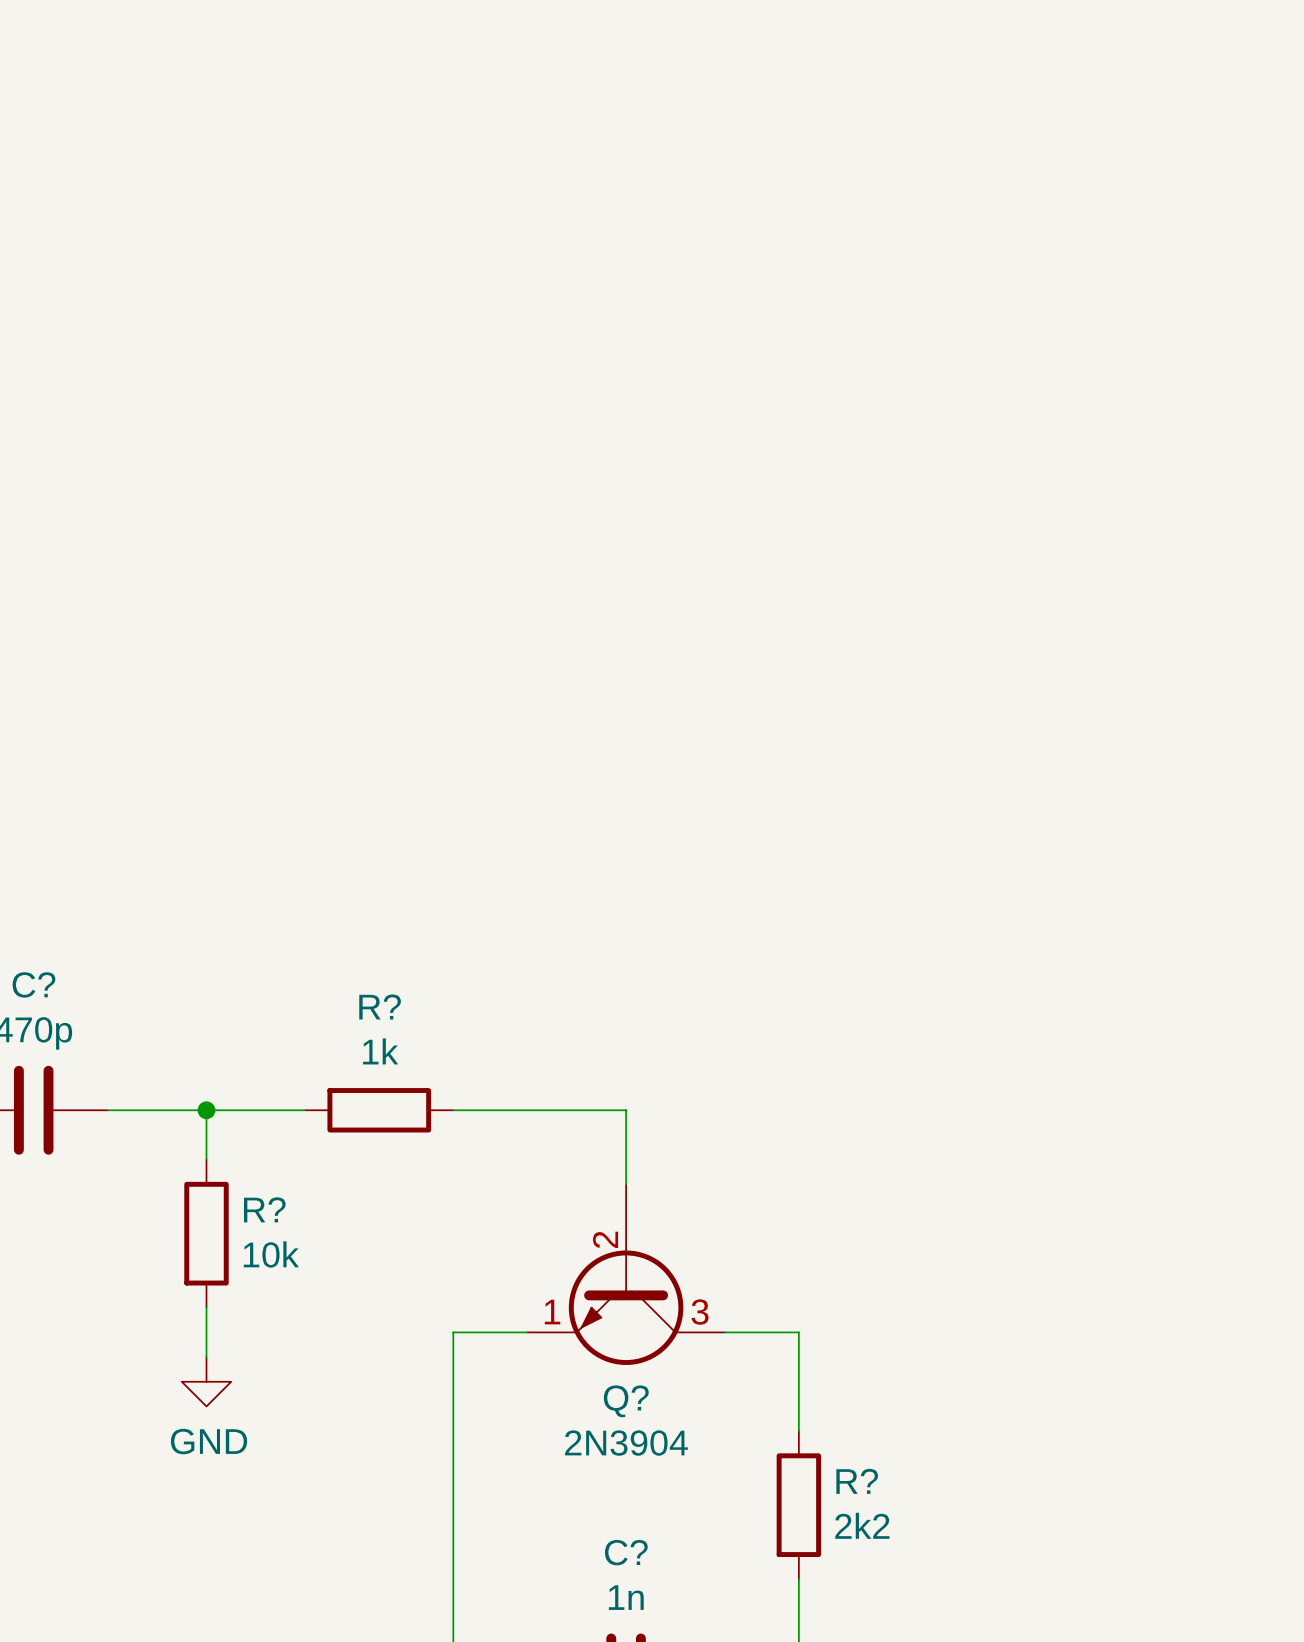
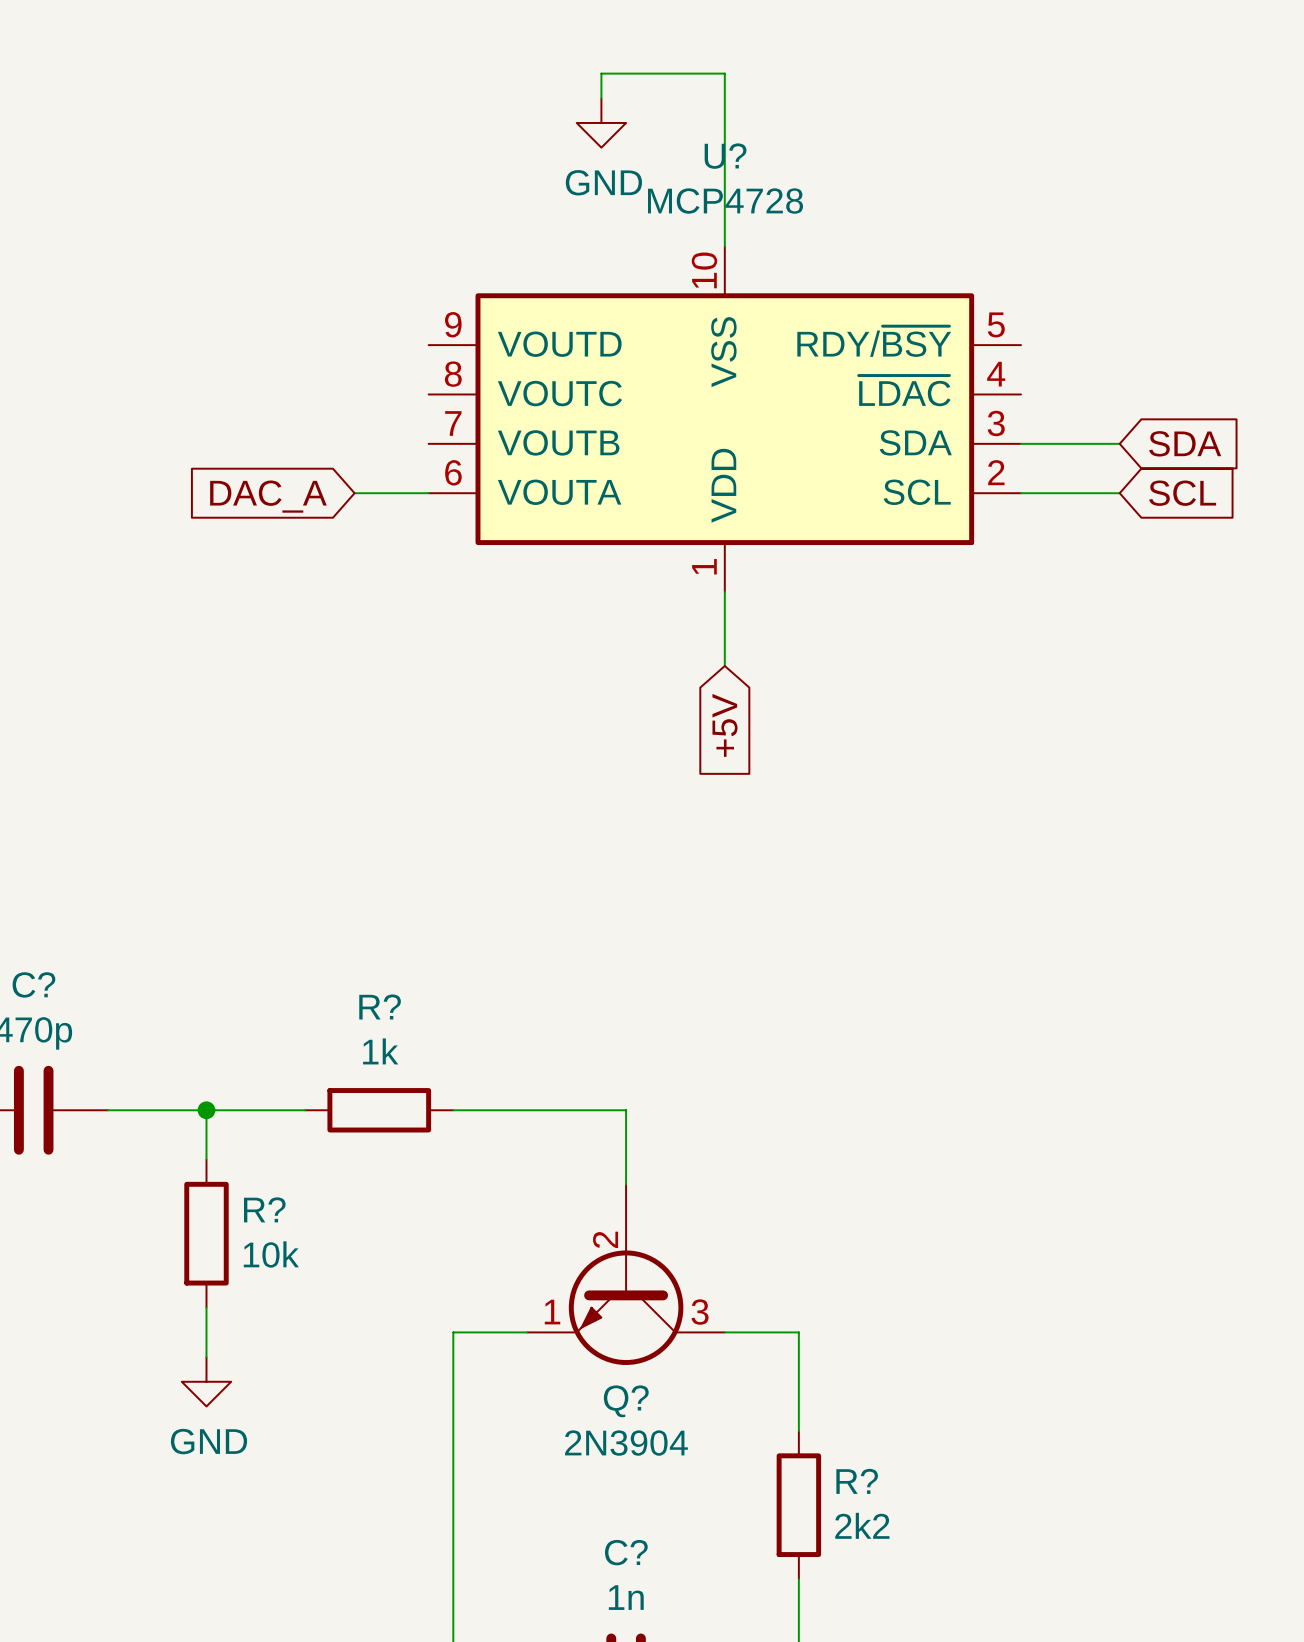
wire: none -> (601, 98) (601, 73) (724, 73) (724, 246)
power symbol: none -> GND (601, 122)
U?: none -> MCP4728 (724, 419)
wire: none -> (1021, 443) (1119, 443)
global label: none -> SDA (1185, 443)
wire: none -> (354, 493) (428, 493)
wire: none -> (1021, 493) (1119, 493)
global label: none -> SCL (1182, 493)
global label: none -> DAC_A (268, 496)
wire: none -> (724, 591) (724, 665)
global label: none -> +5V (725, 725)

